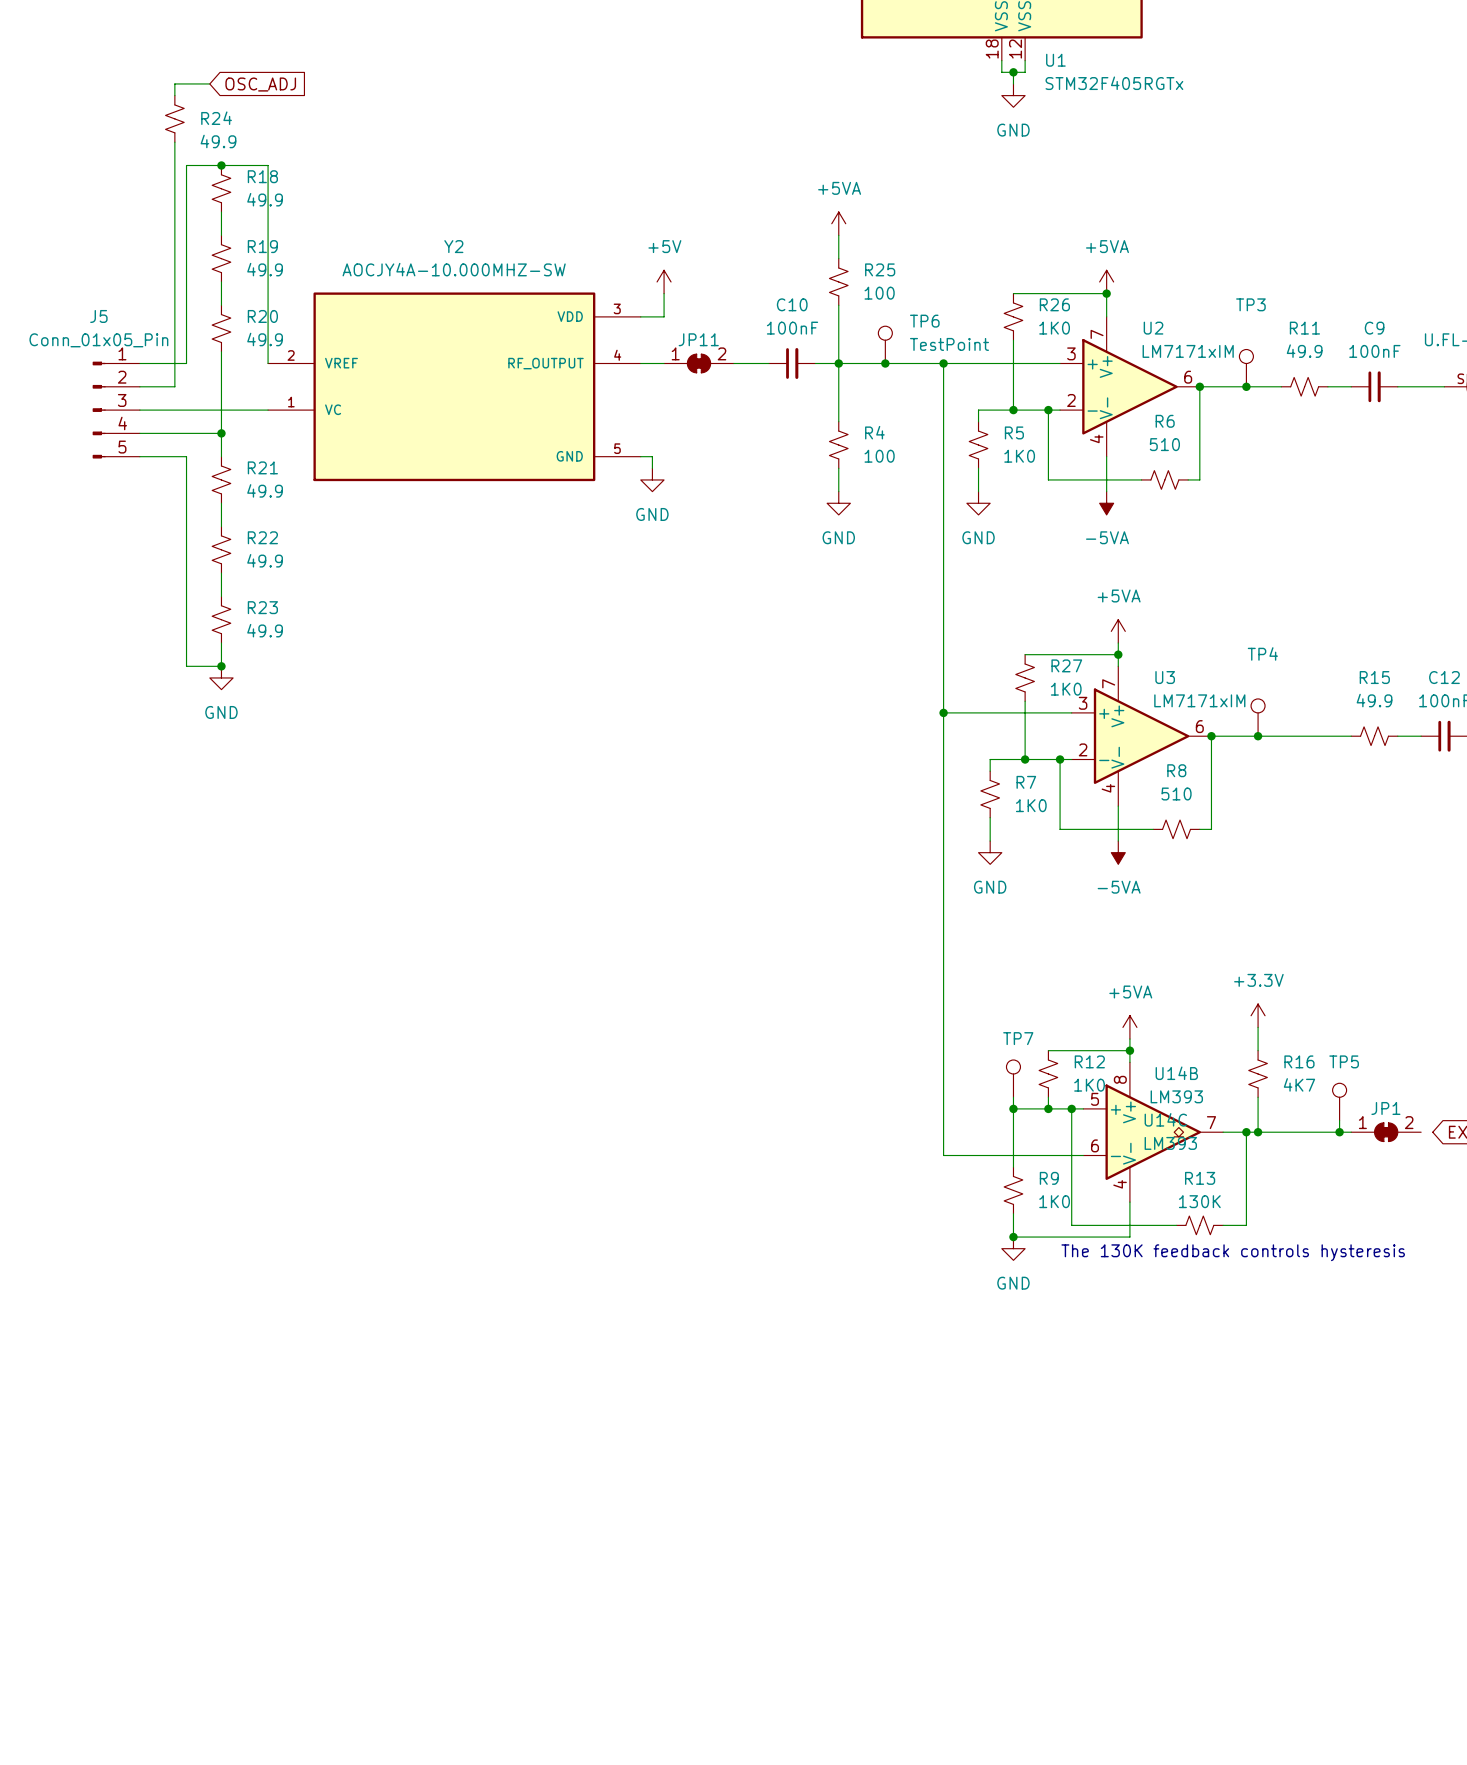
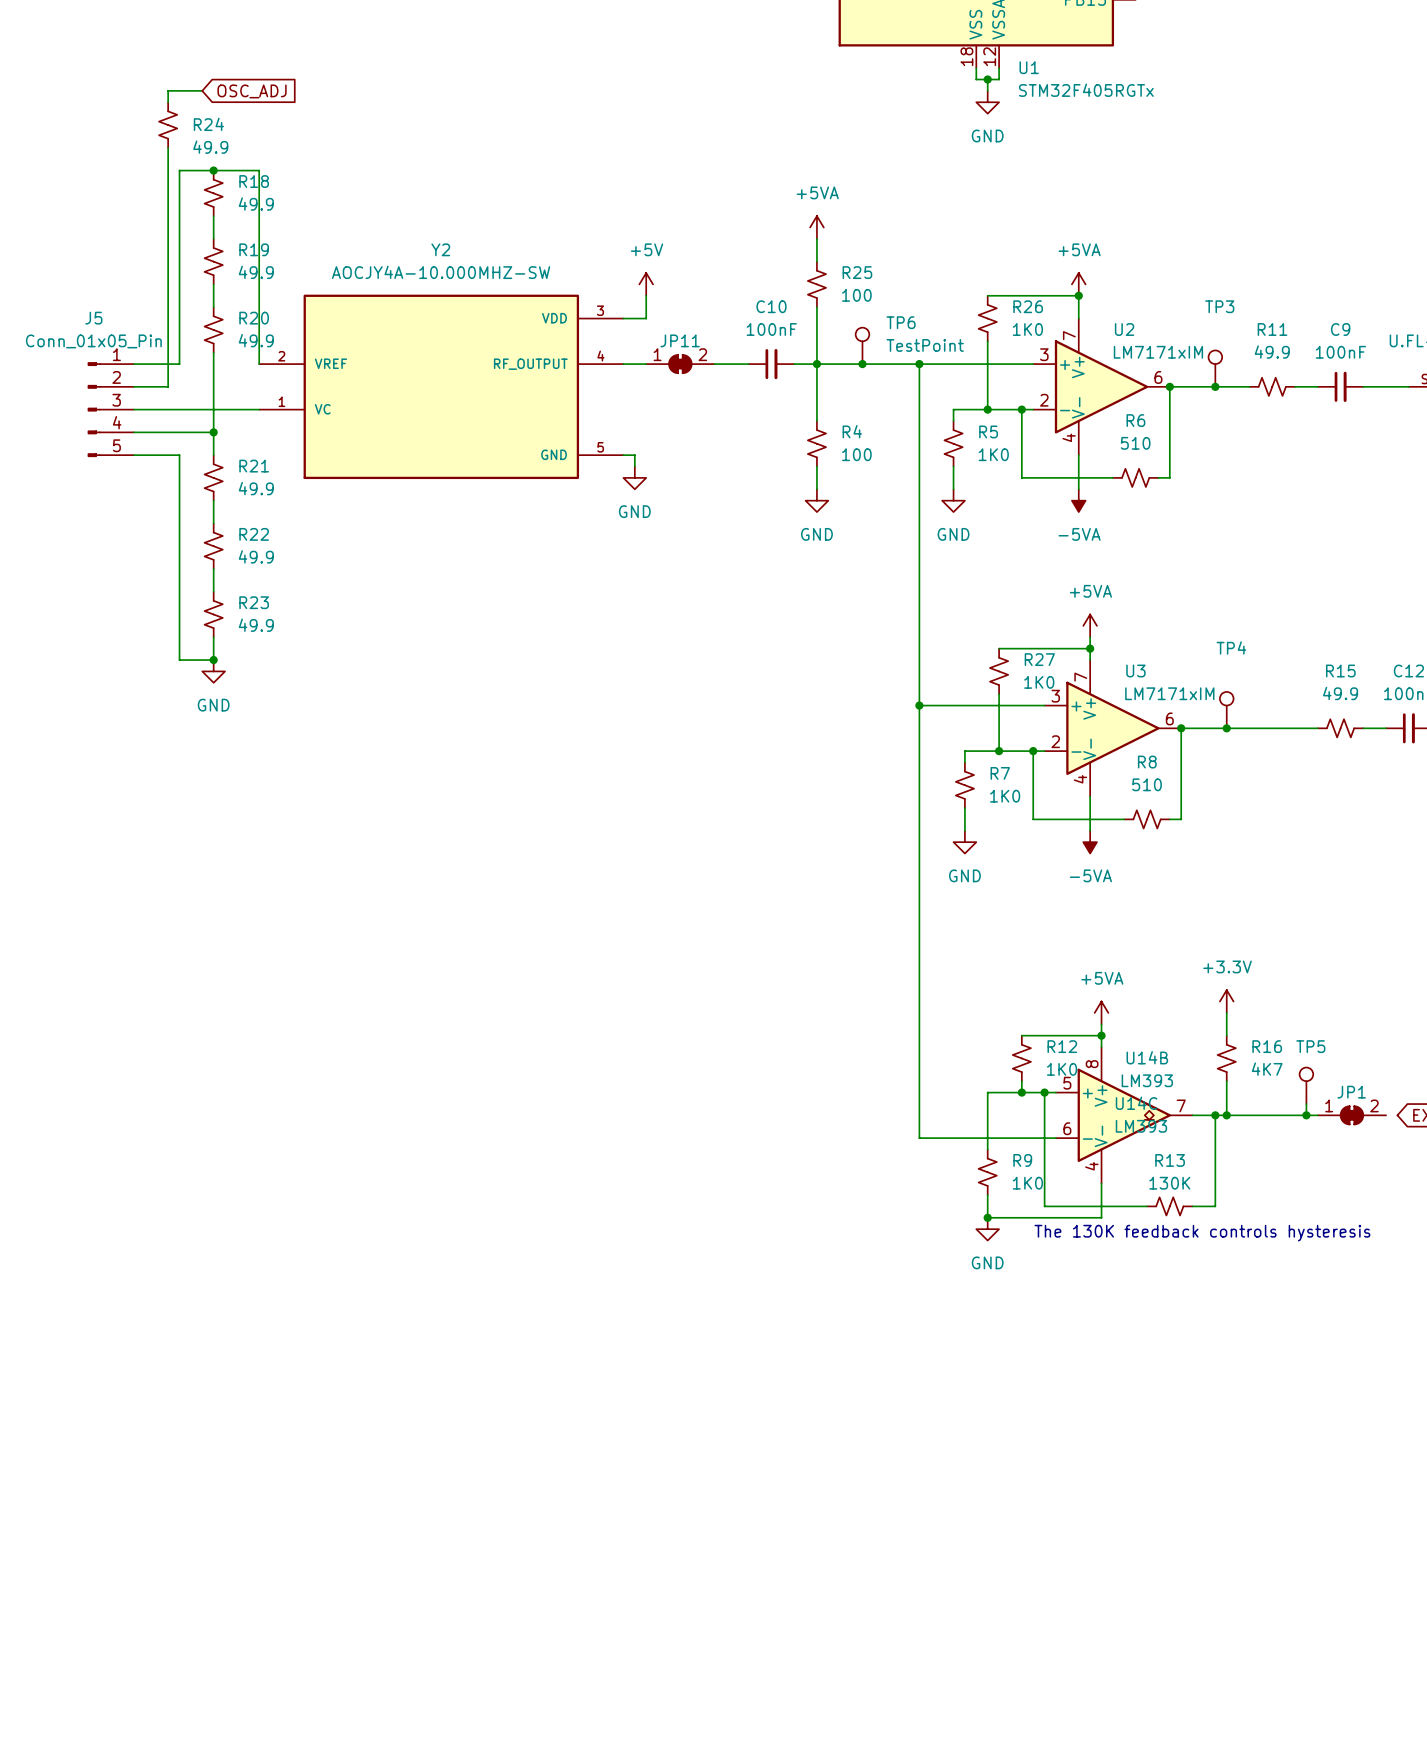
TP7: (1013, 1078) -> none
wire: (1013, 1097) (1013, 1108) -> none
junction: (1013, 1108) -> none

